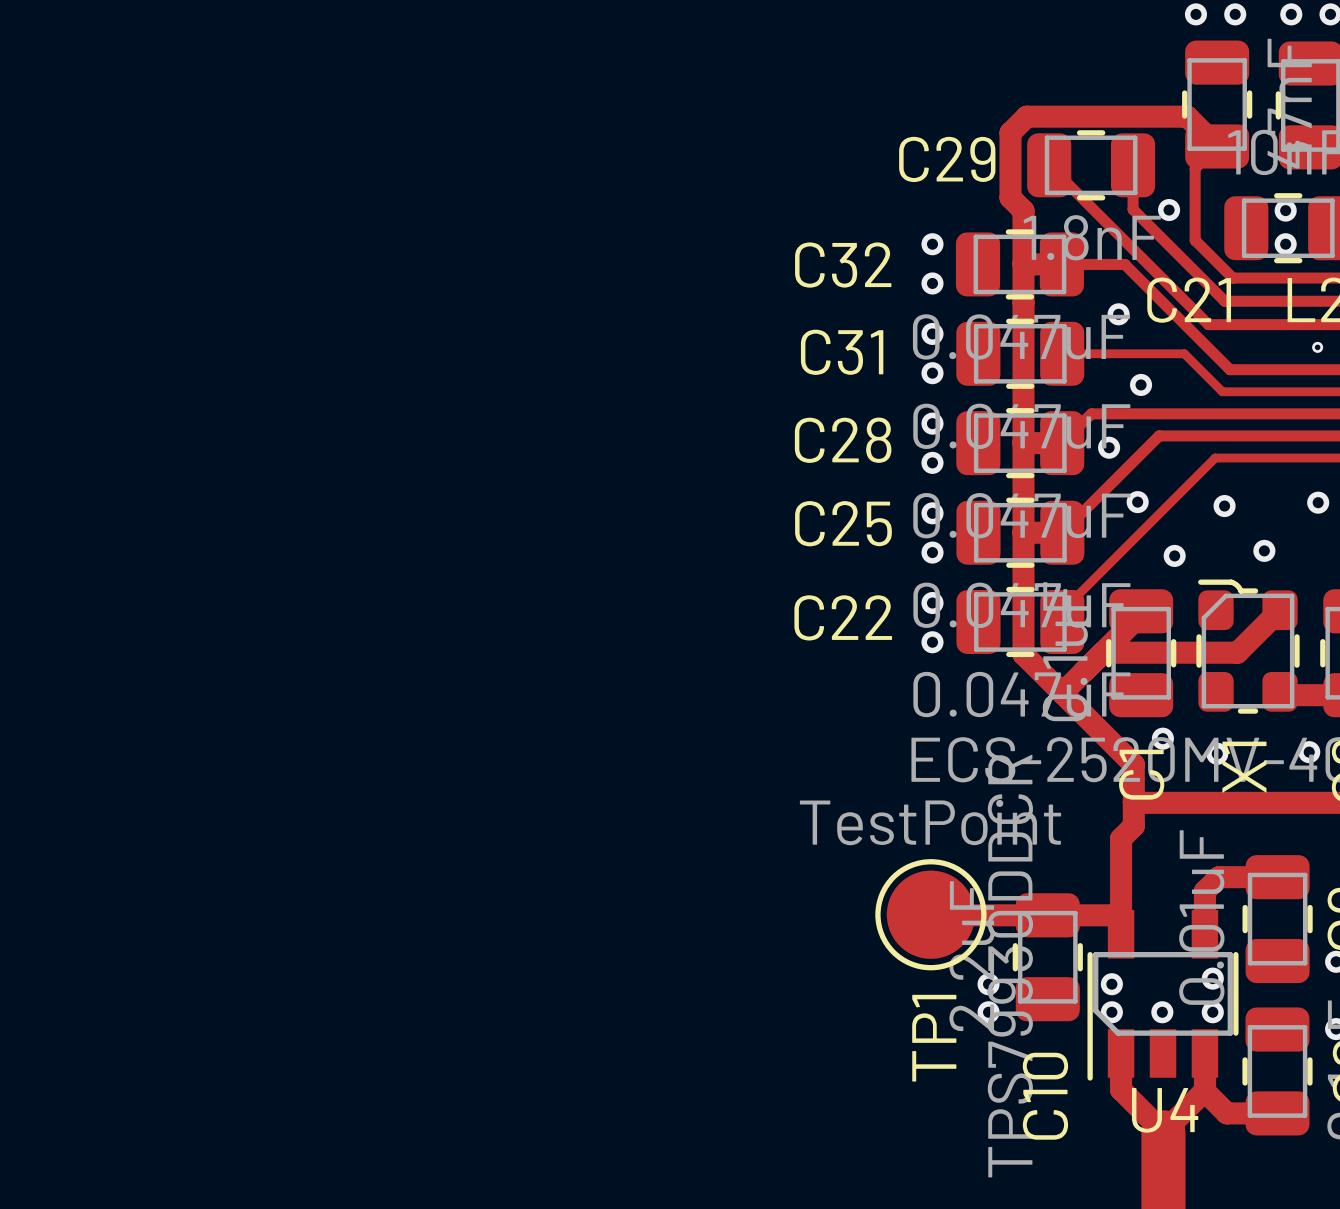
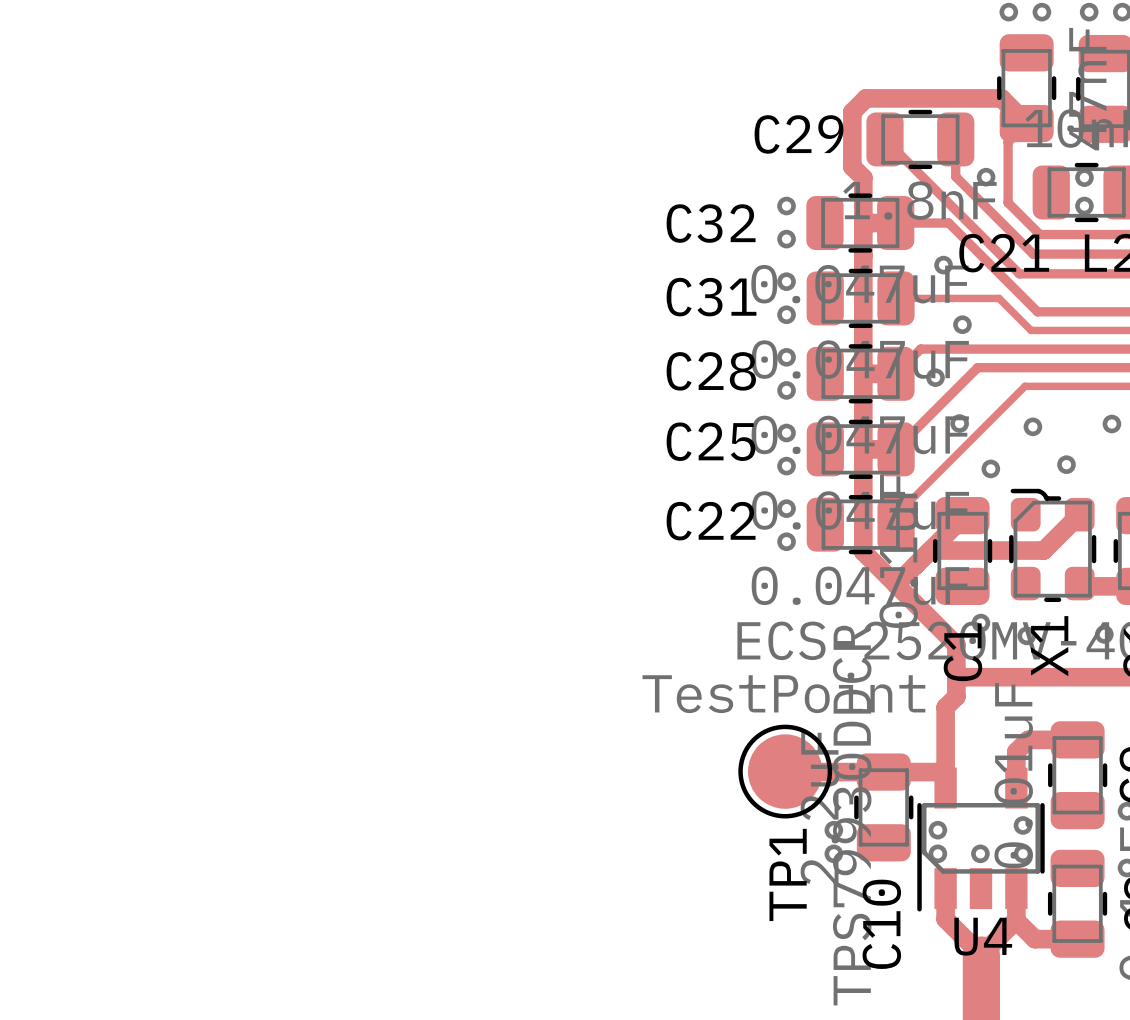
via: (1317, 347) -> none

